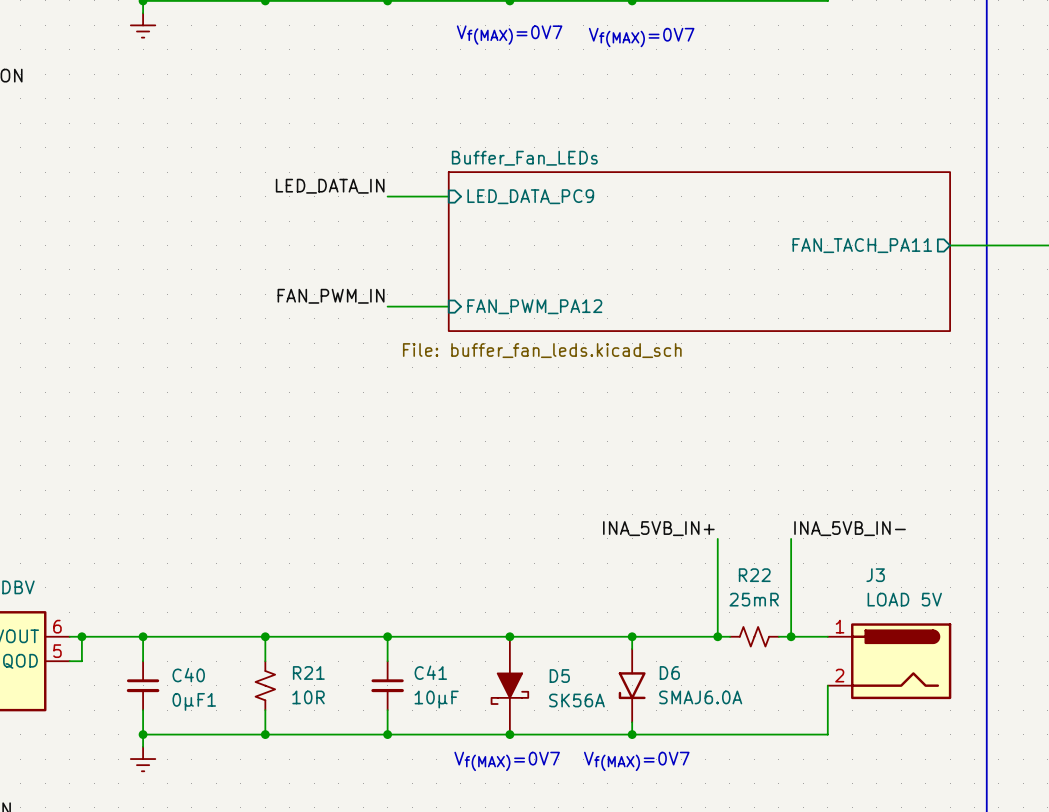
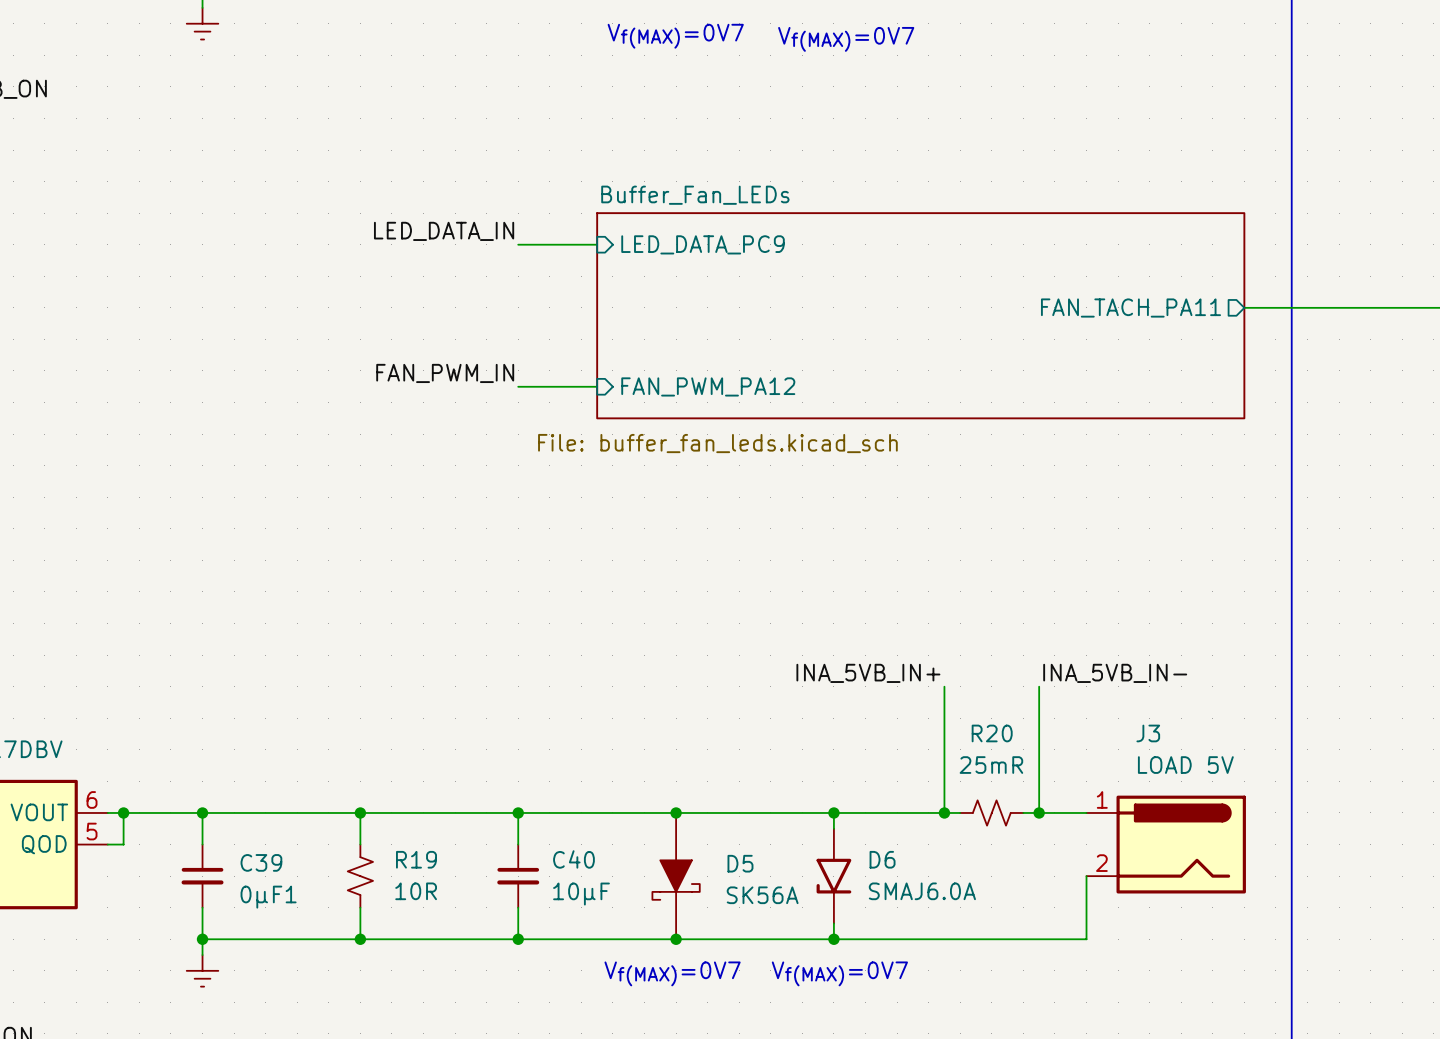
R22 name: R22 (754, 575) -> R20 (992, 733)
R21 name: R21 (308, 672) -> R19 (416, 859)
C41 name: C41 (430, 672) -> C40 (573, 859)
C40 name: C40 (188, 675) -> C39 (261, 862)

